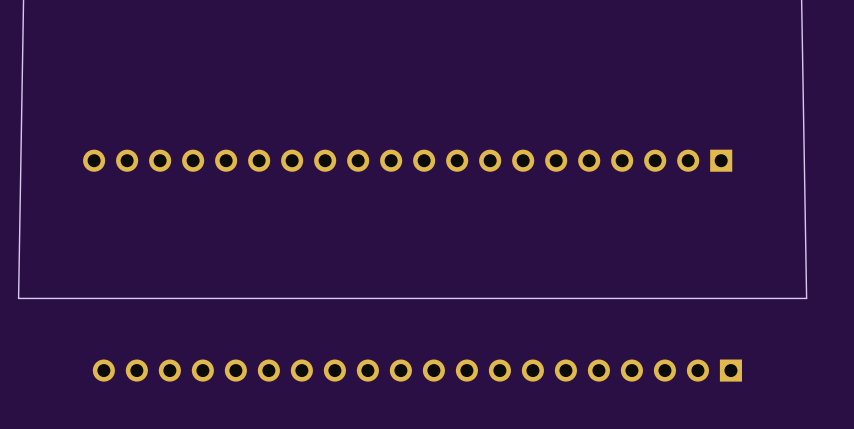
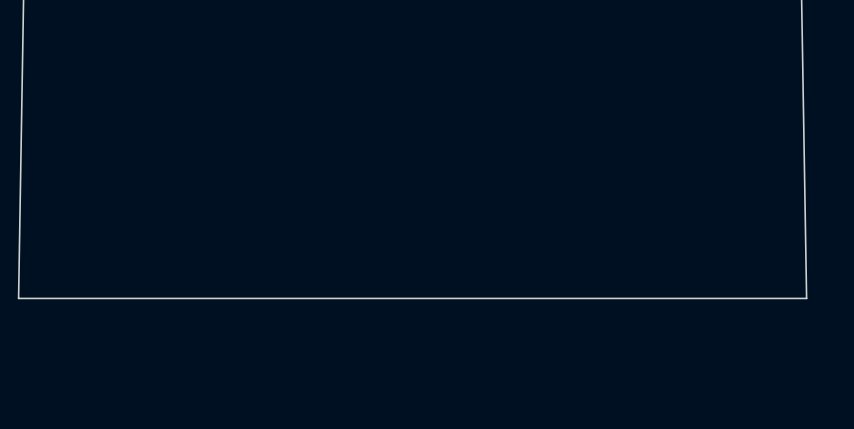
part: (407, 160) -> none
part: (417, 370) -> none

